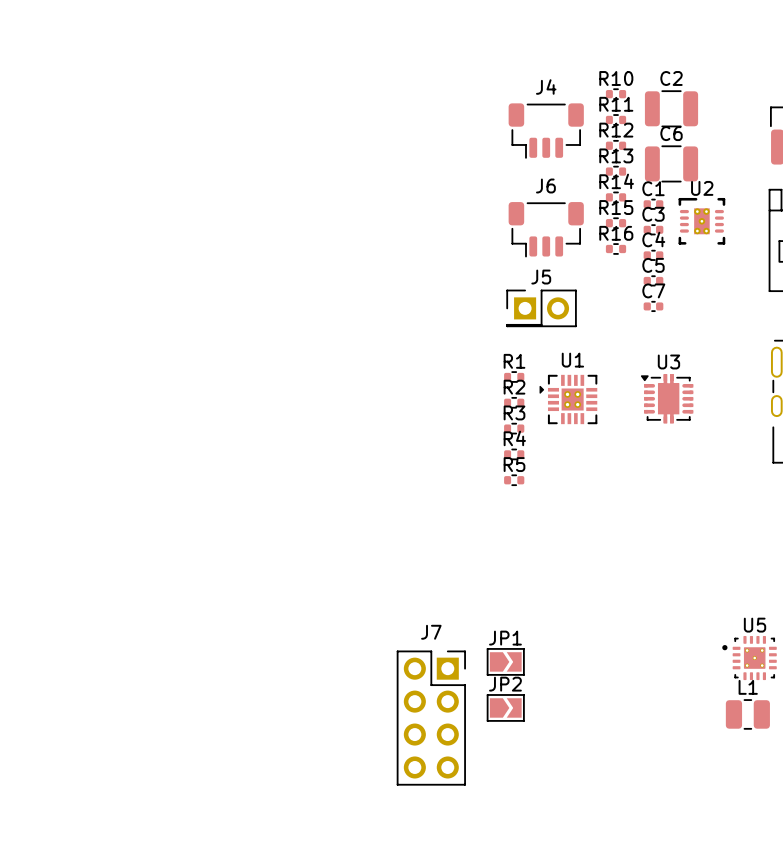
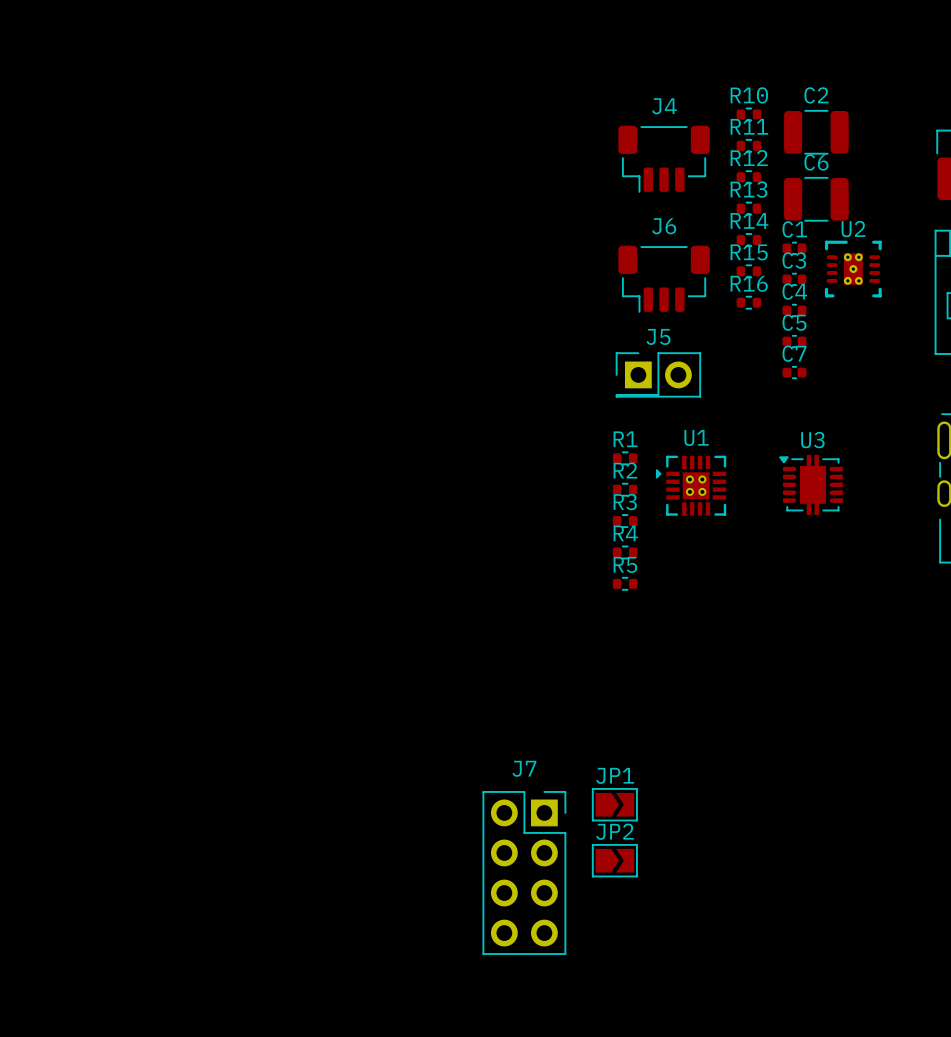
U5: (749, 658) -> none
L1: (747, 714) -> none

